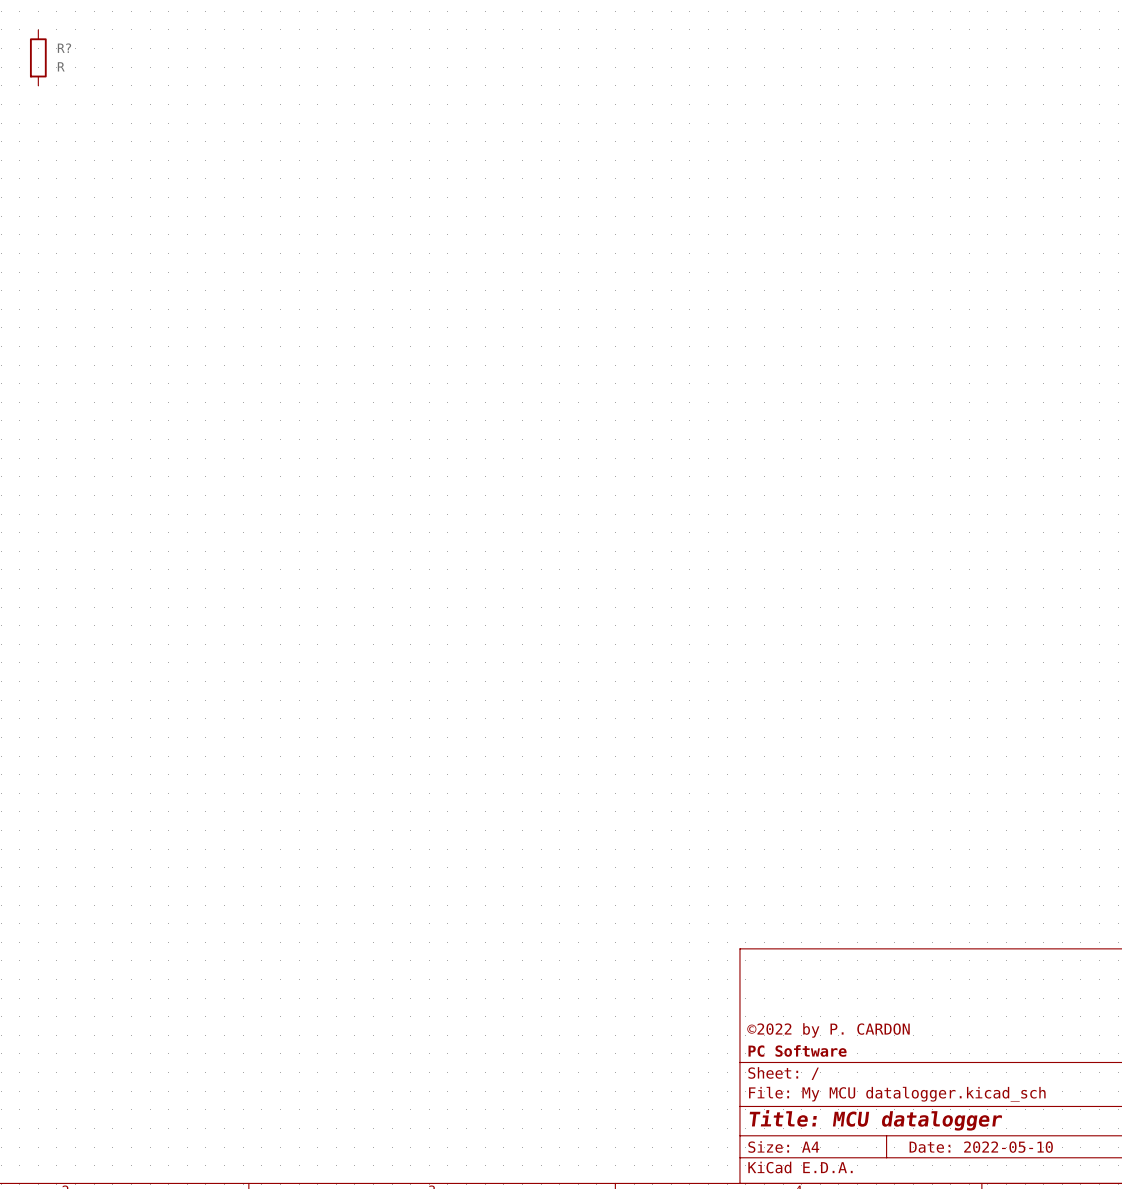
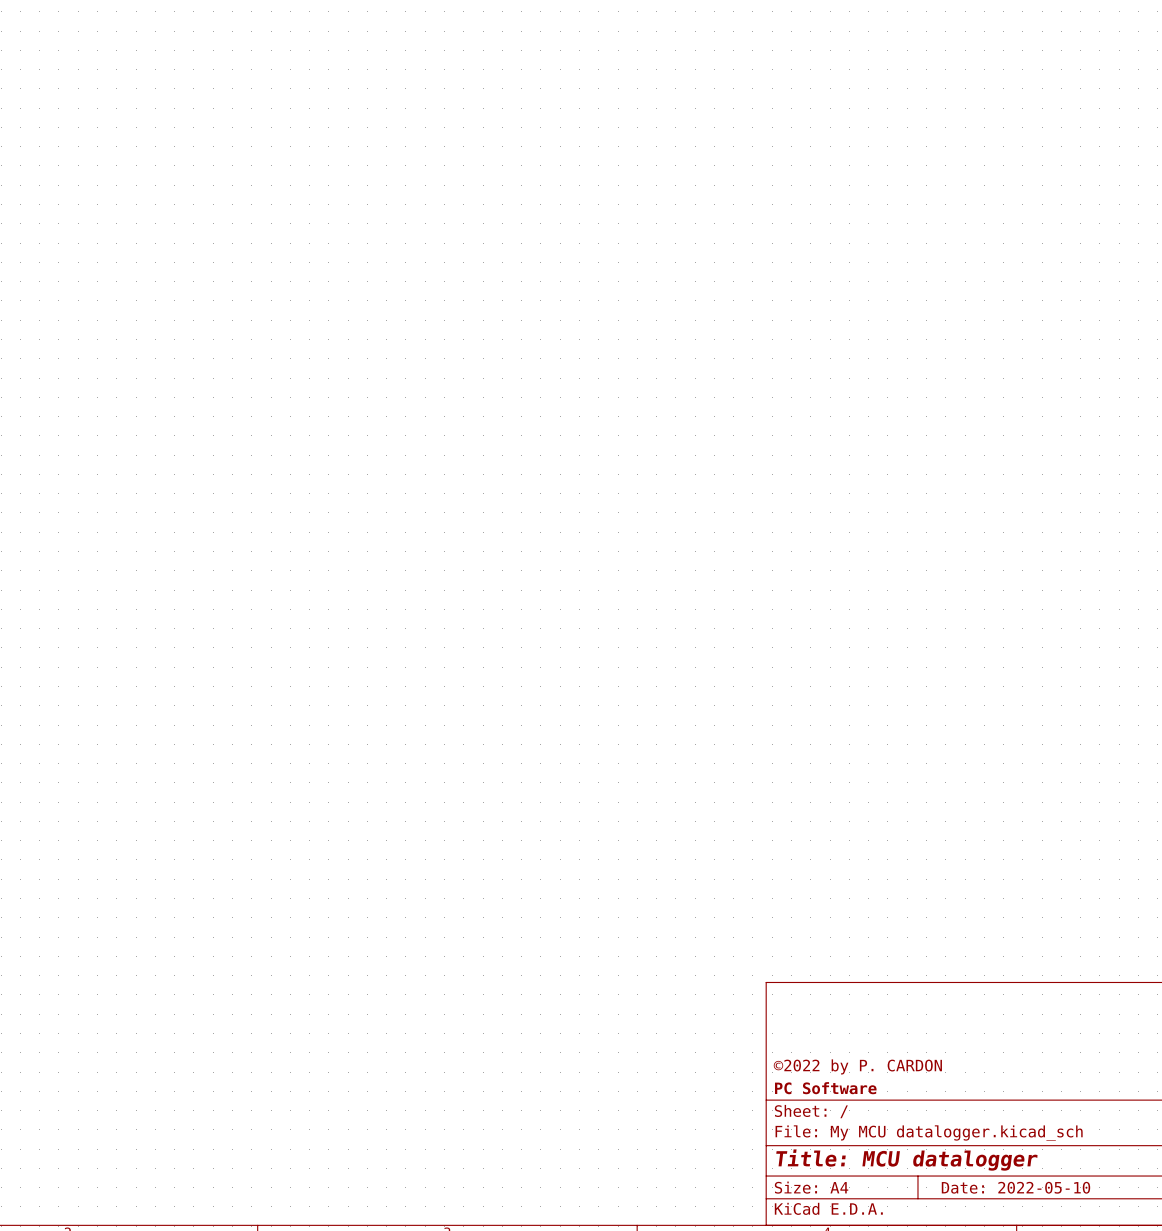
R?: R (38, 57) -> none

